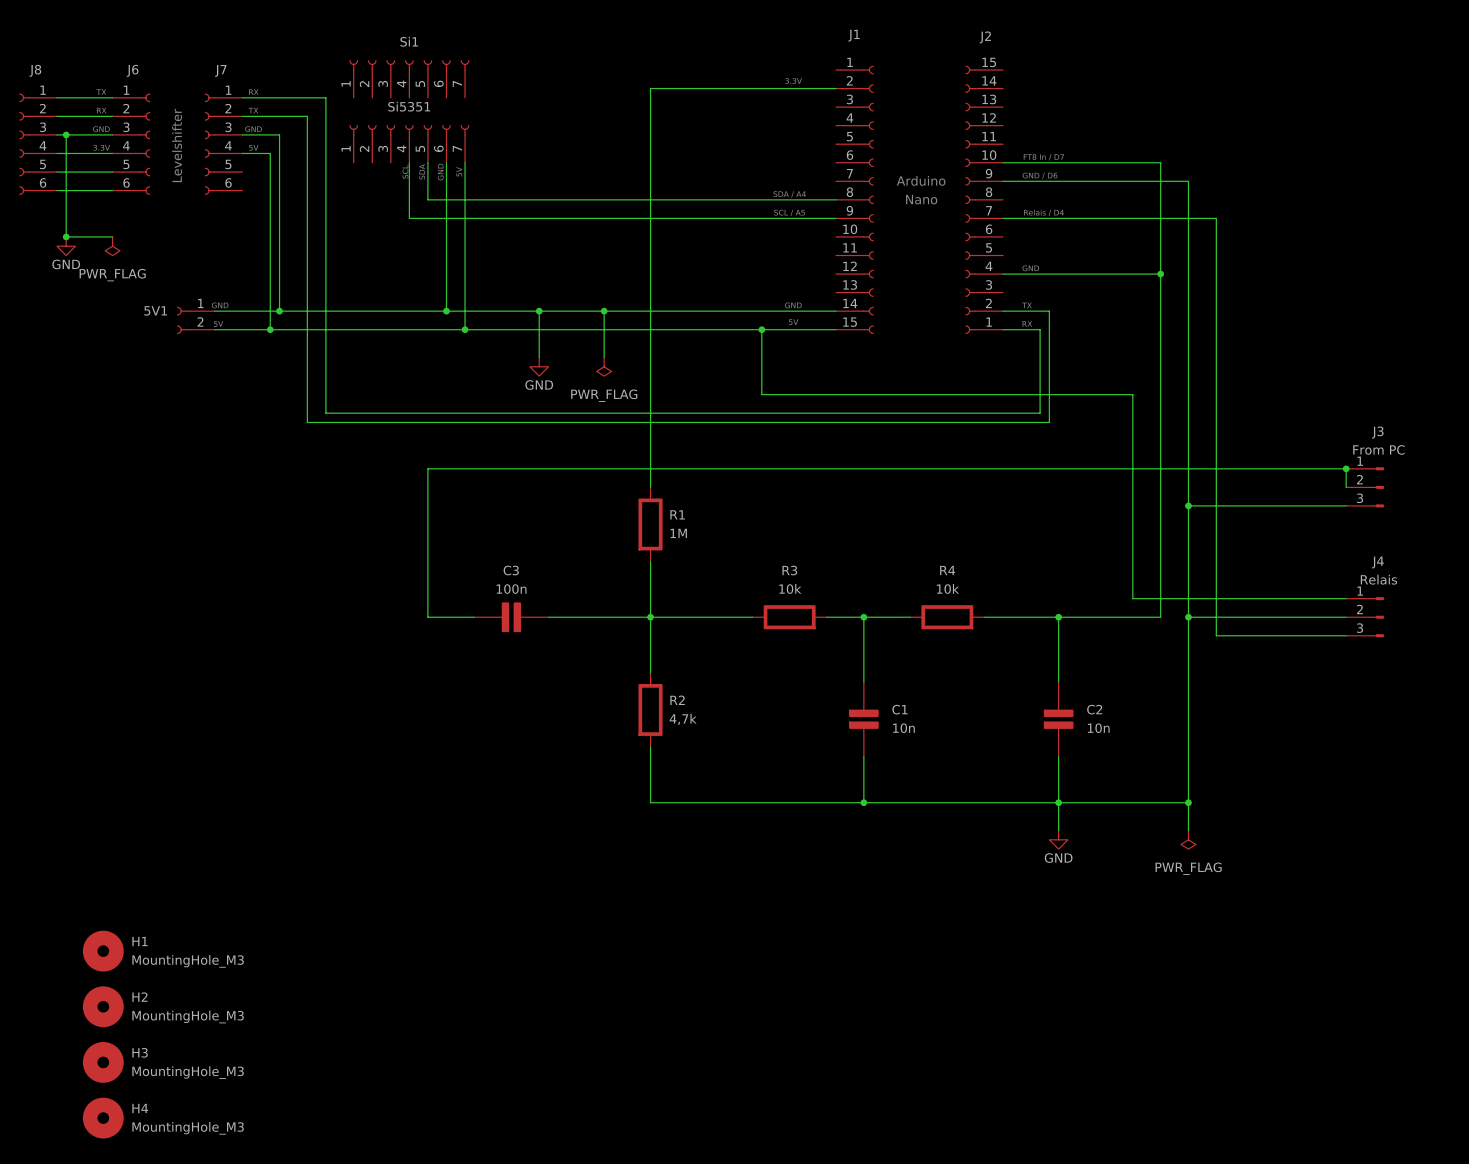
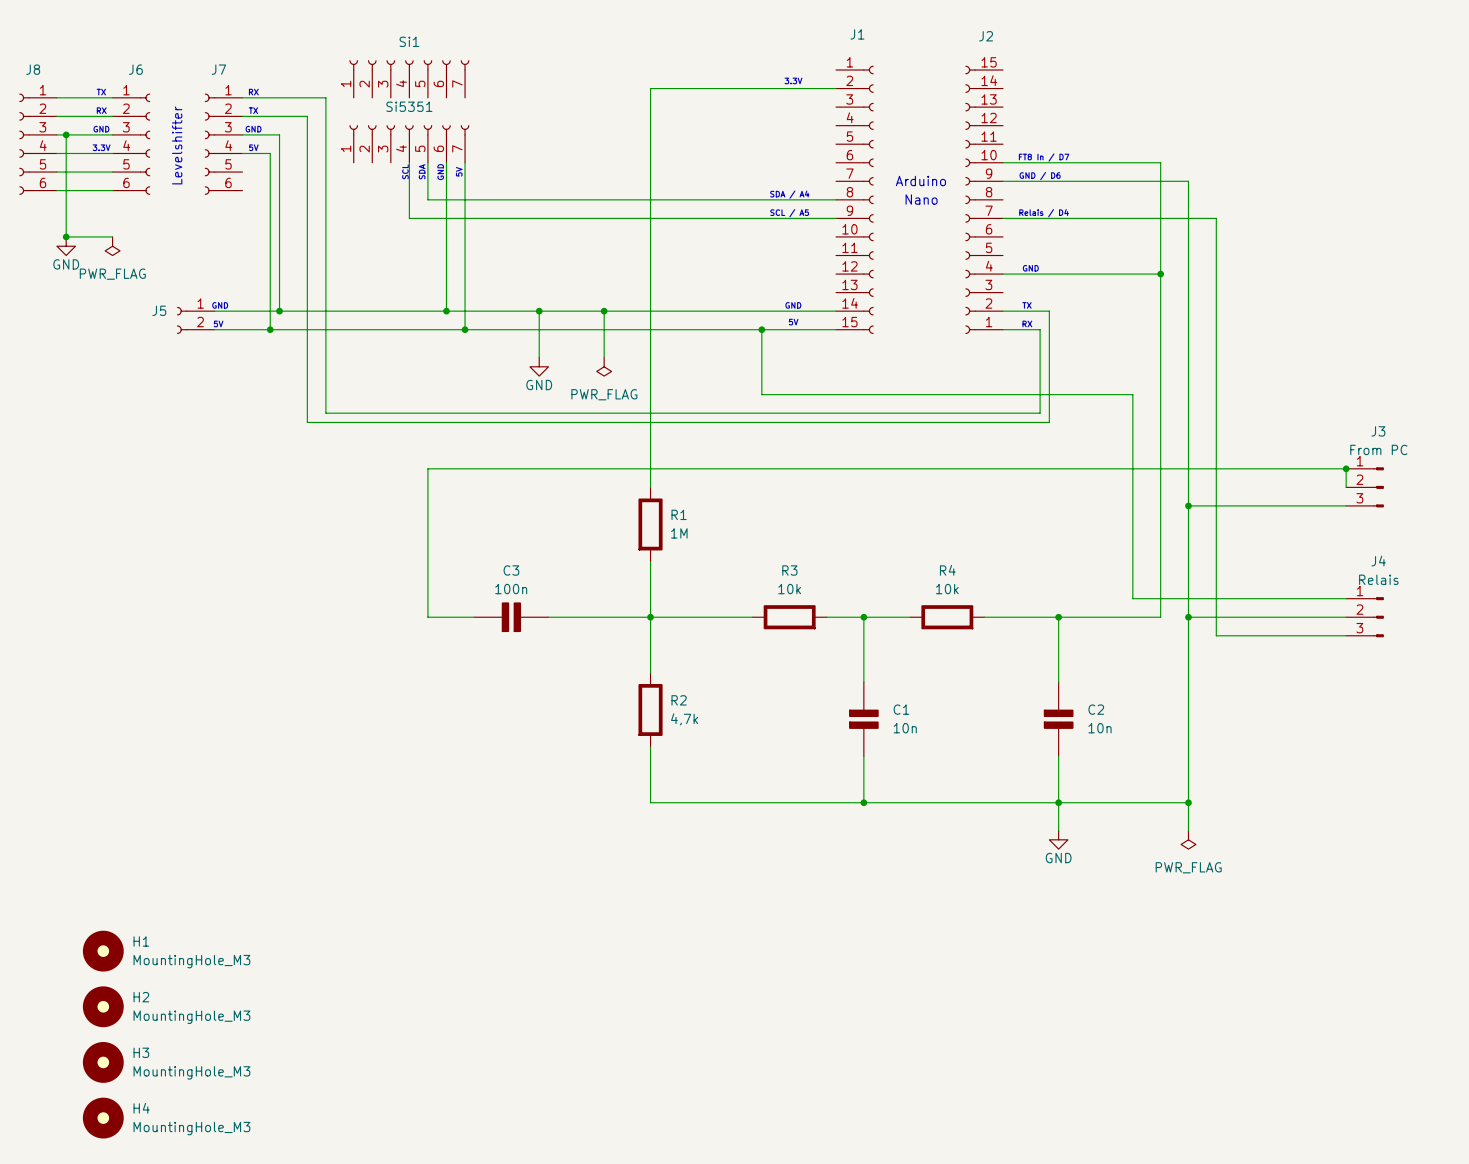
5V1 name: 5V1 (155, 310) -> J5 (159, 310)

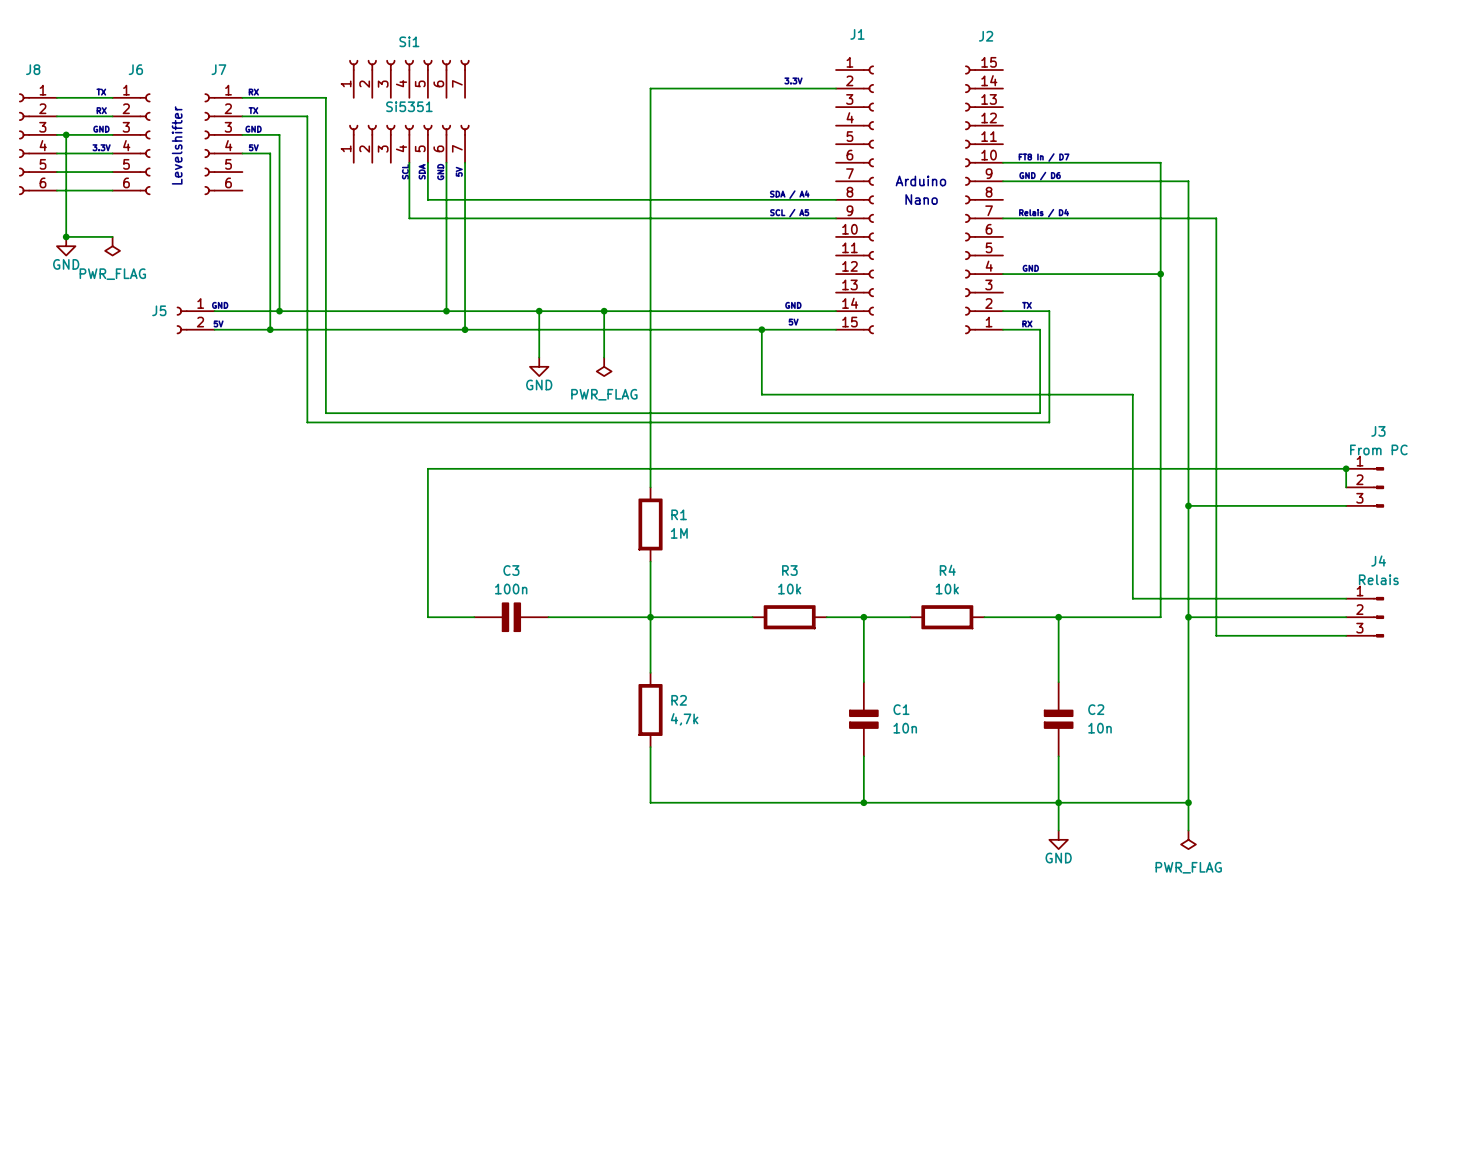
H1: MountingHole_M3 (103, 951) -> none
H2: MountingHole_M3 (103, 1006) -> none
H3: MountingHole_M3 (103, 1062) -> none
H4: MountingHole_M3 (103, 1118) -> none

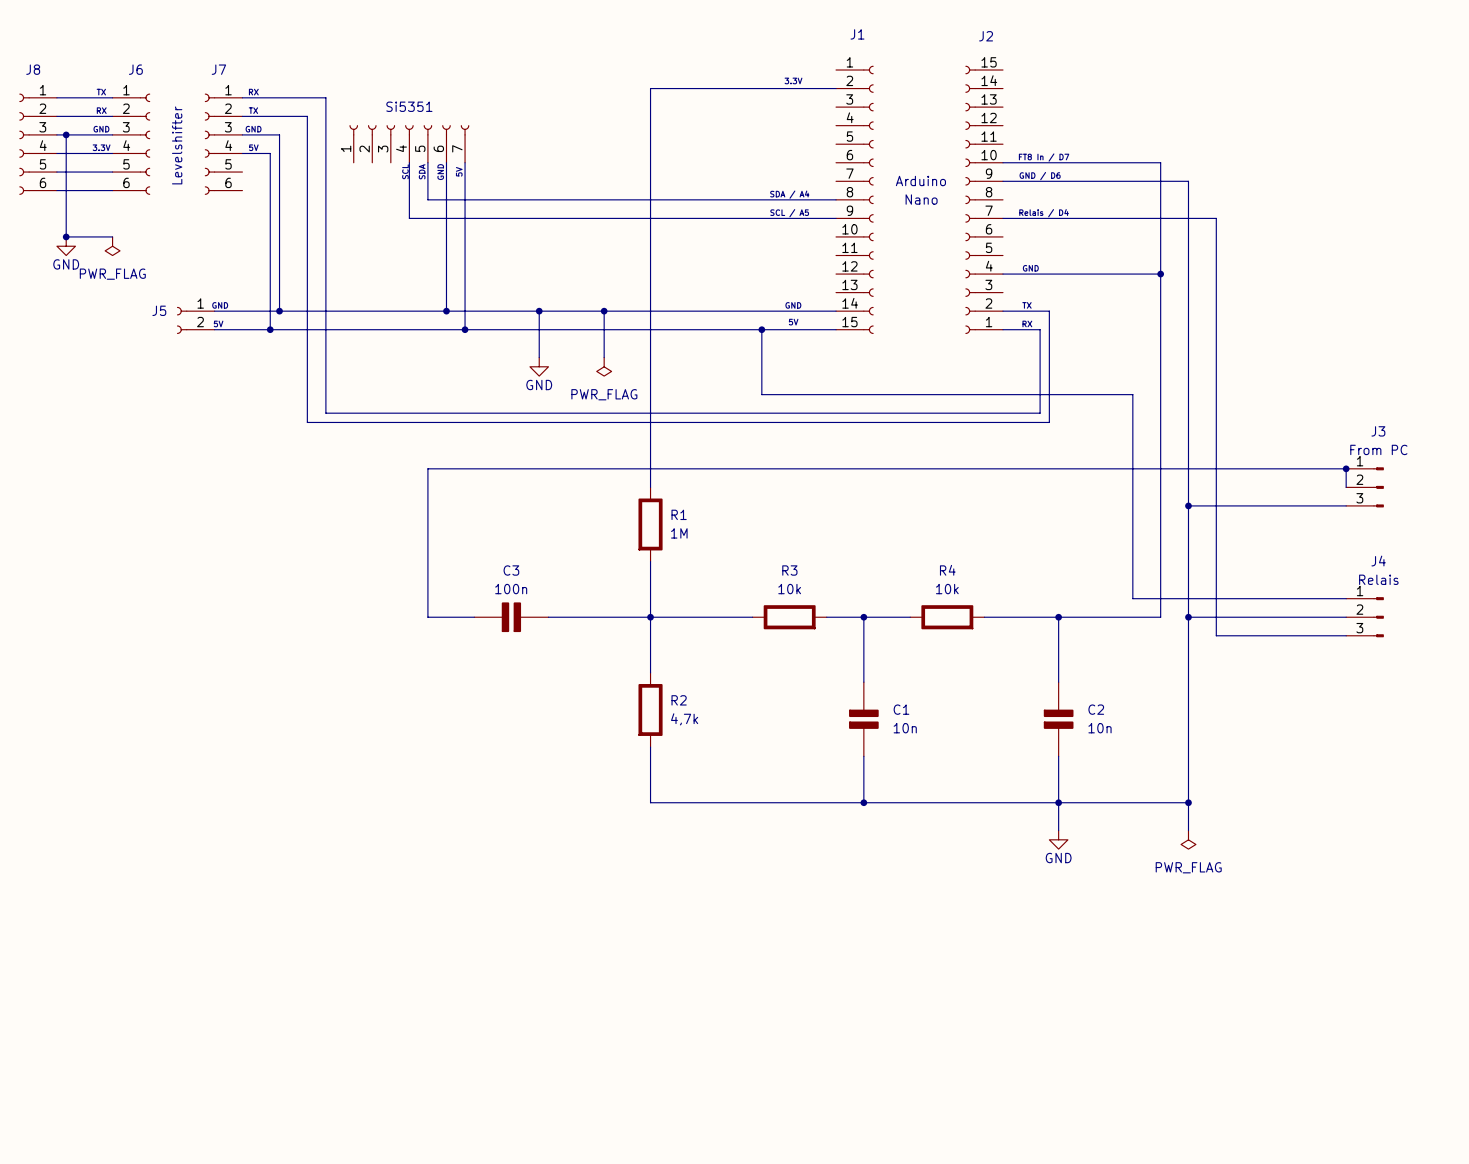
Si1: (409, 79) -> none

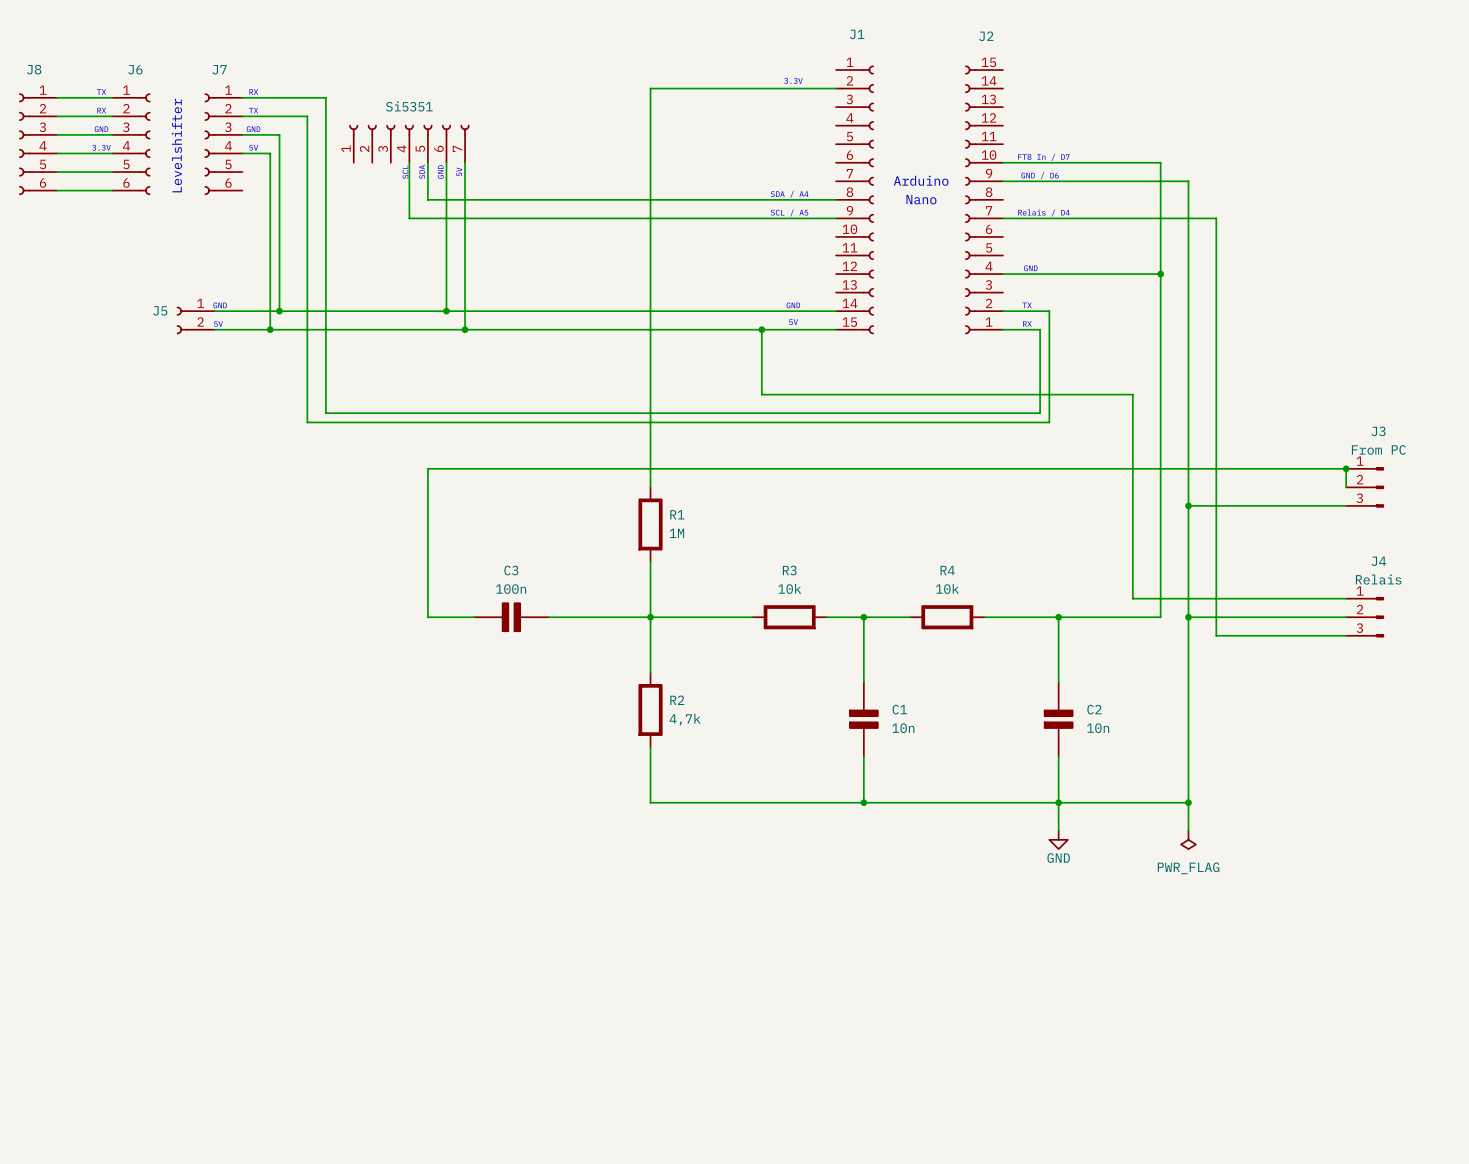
wire: (66, 134) (66, 236) (112, 236) -> none
junction: (66, 134) -> none
junction: (66, 236) -> none
power symbol: GND (66, 246) -> none
power symbol: PWR_FLAG (112, 246) -> none
wire: (539, 311) (539, 357) -> none
junction: (539, 311) -> none
wire: (604, 311) (604, 357) -> none
junction: (604, 311) -> none
power symbol: GND (539, 366) -> none
power symbol: PWR_FLAG (604, 366) -> none

